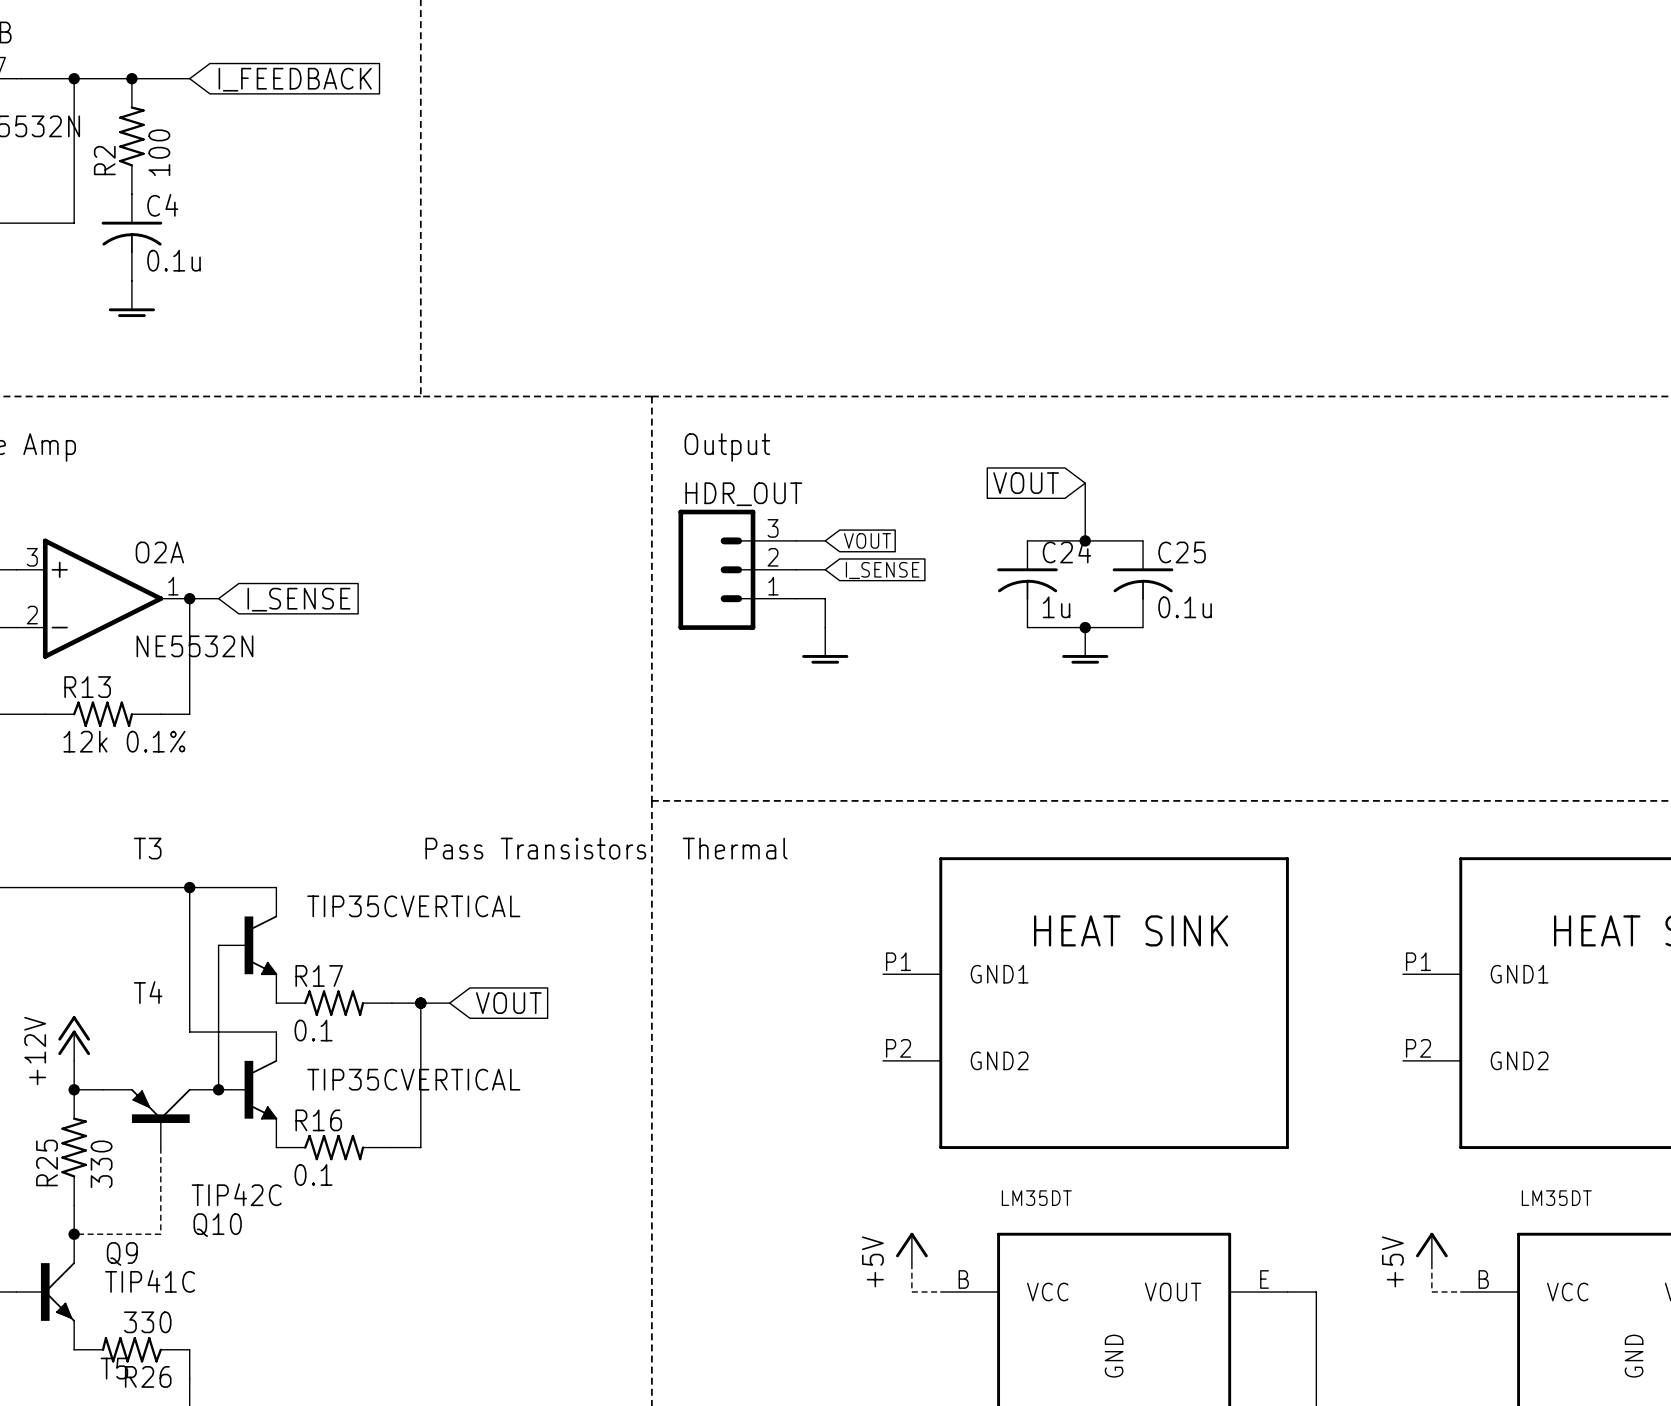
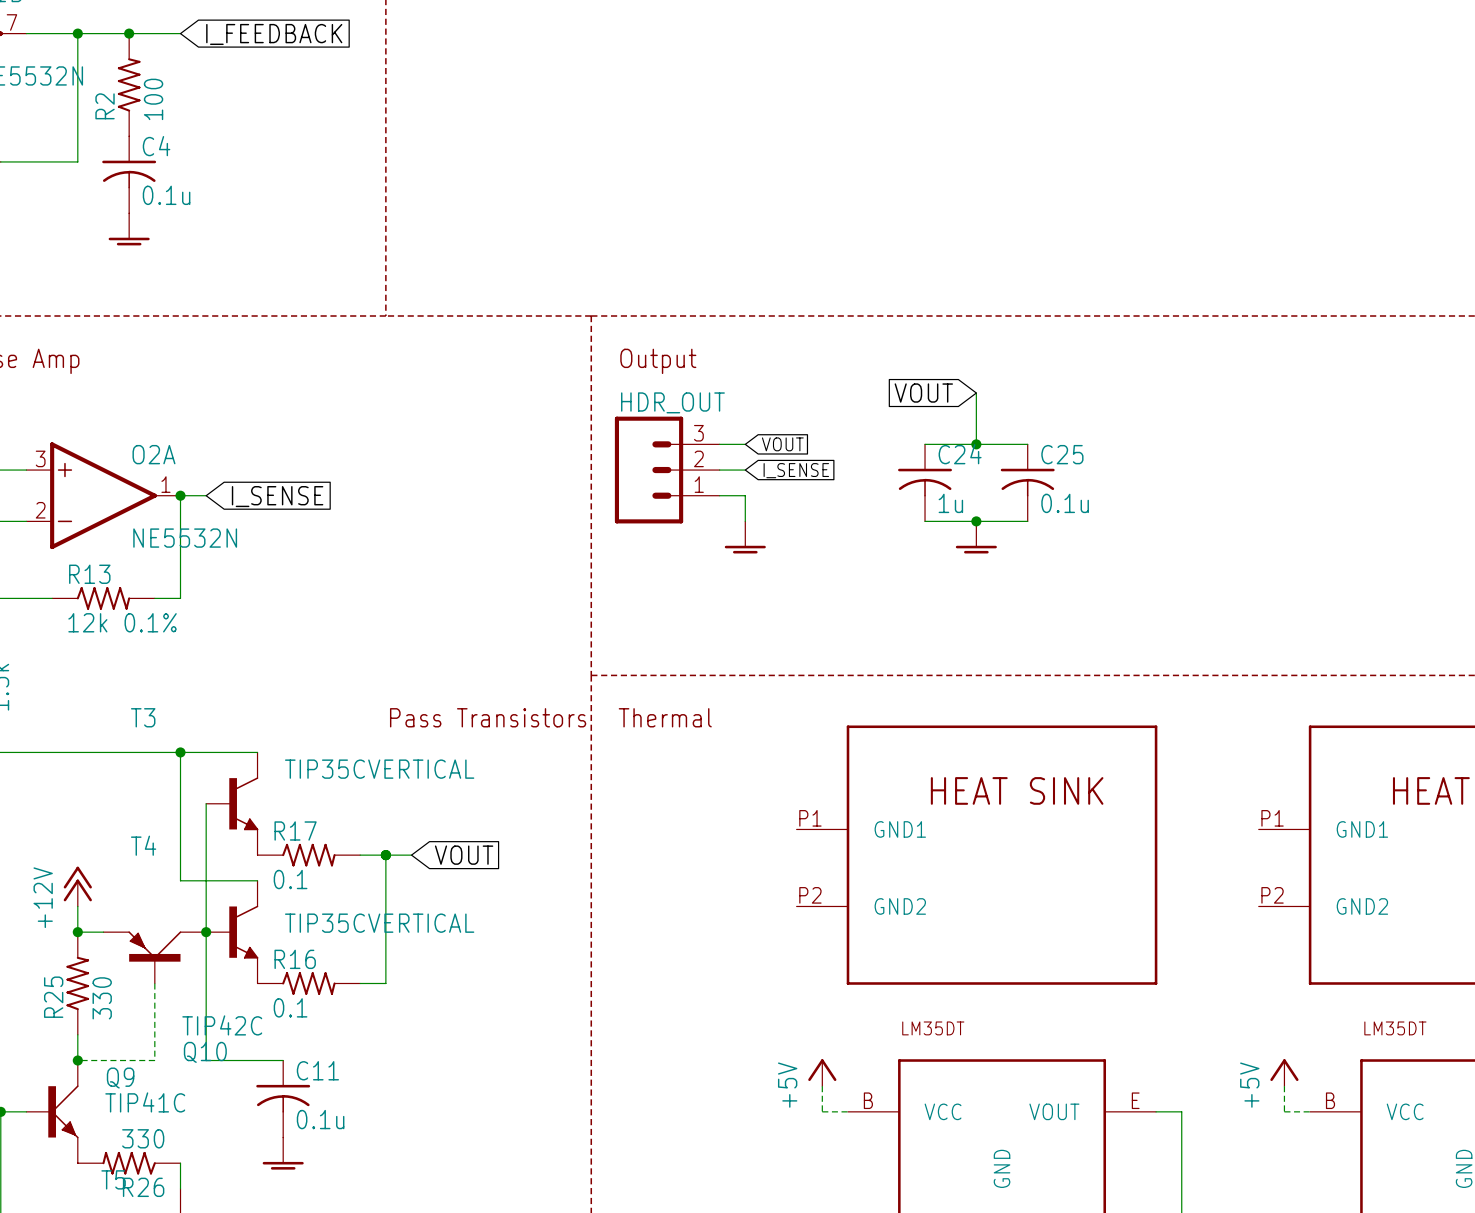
wire: none -> (206, 932) (206, 1060) (283, 1060)
C11: none -> 0.1u (283, 1099)
power symbol: none -> (283, 1153)

